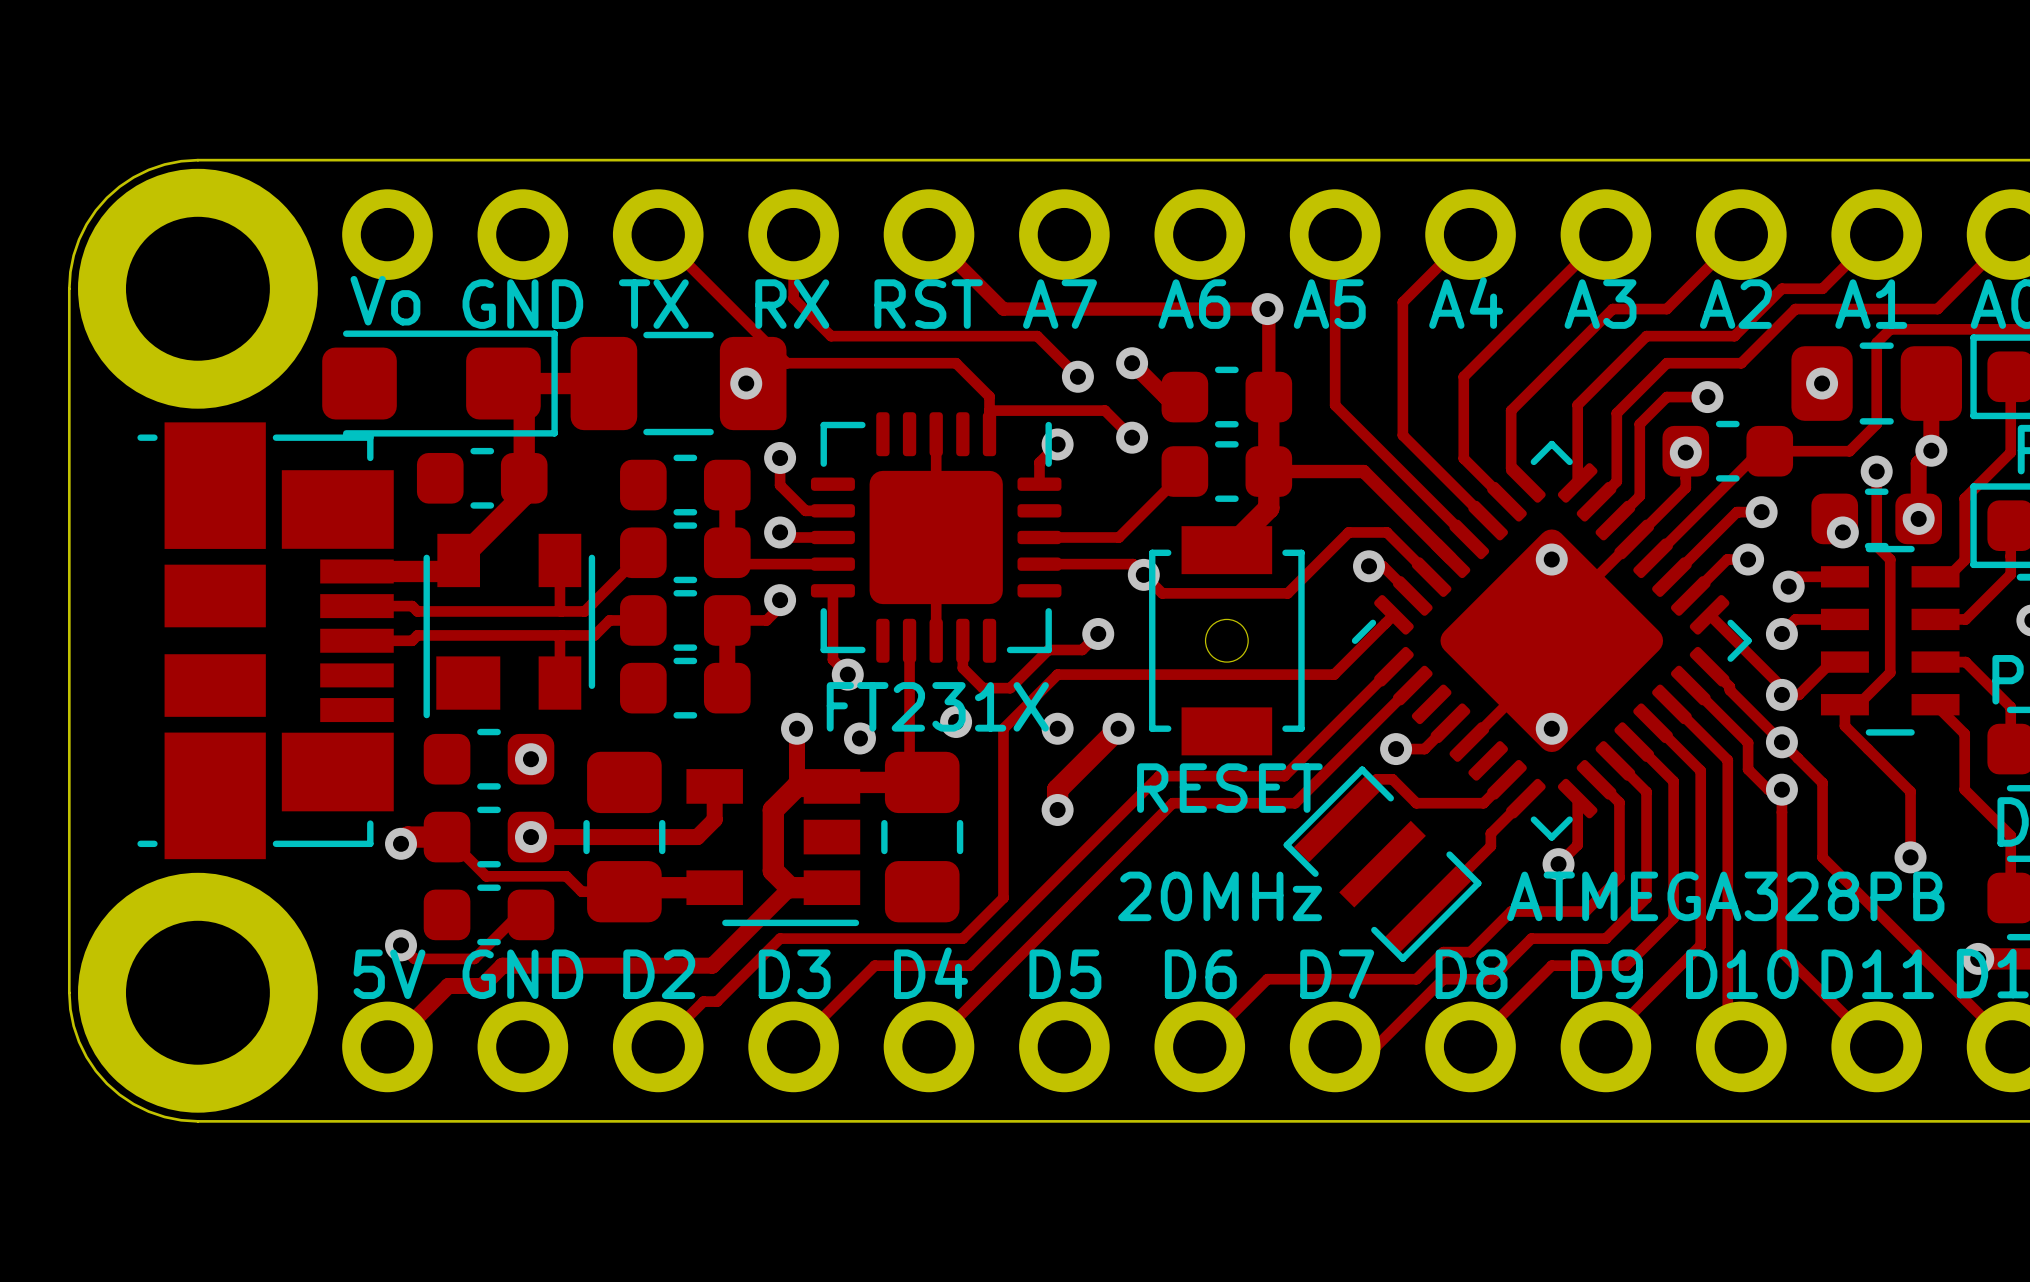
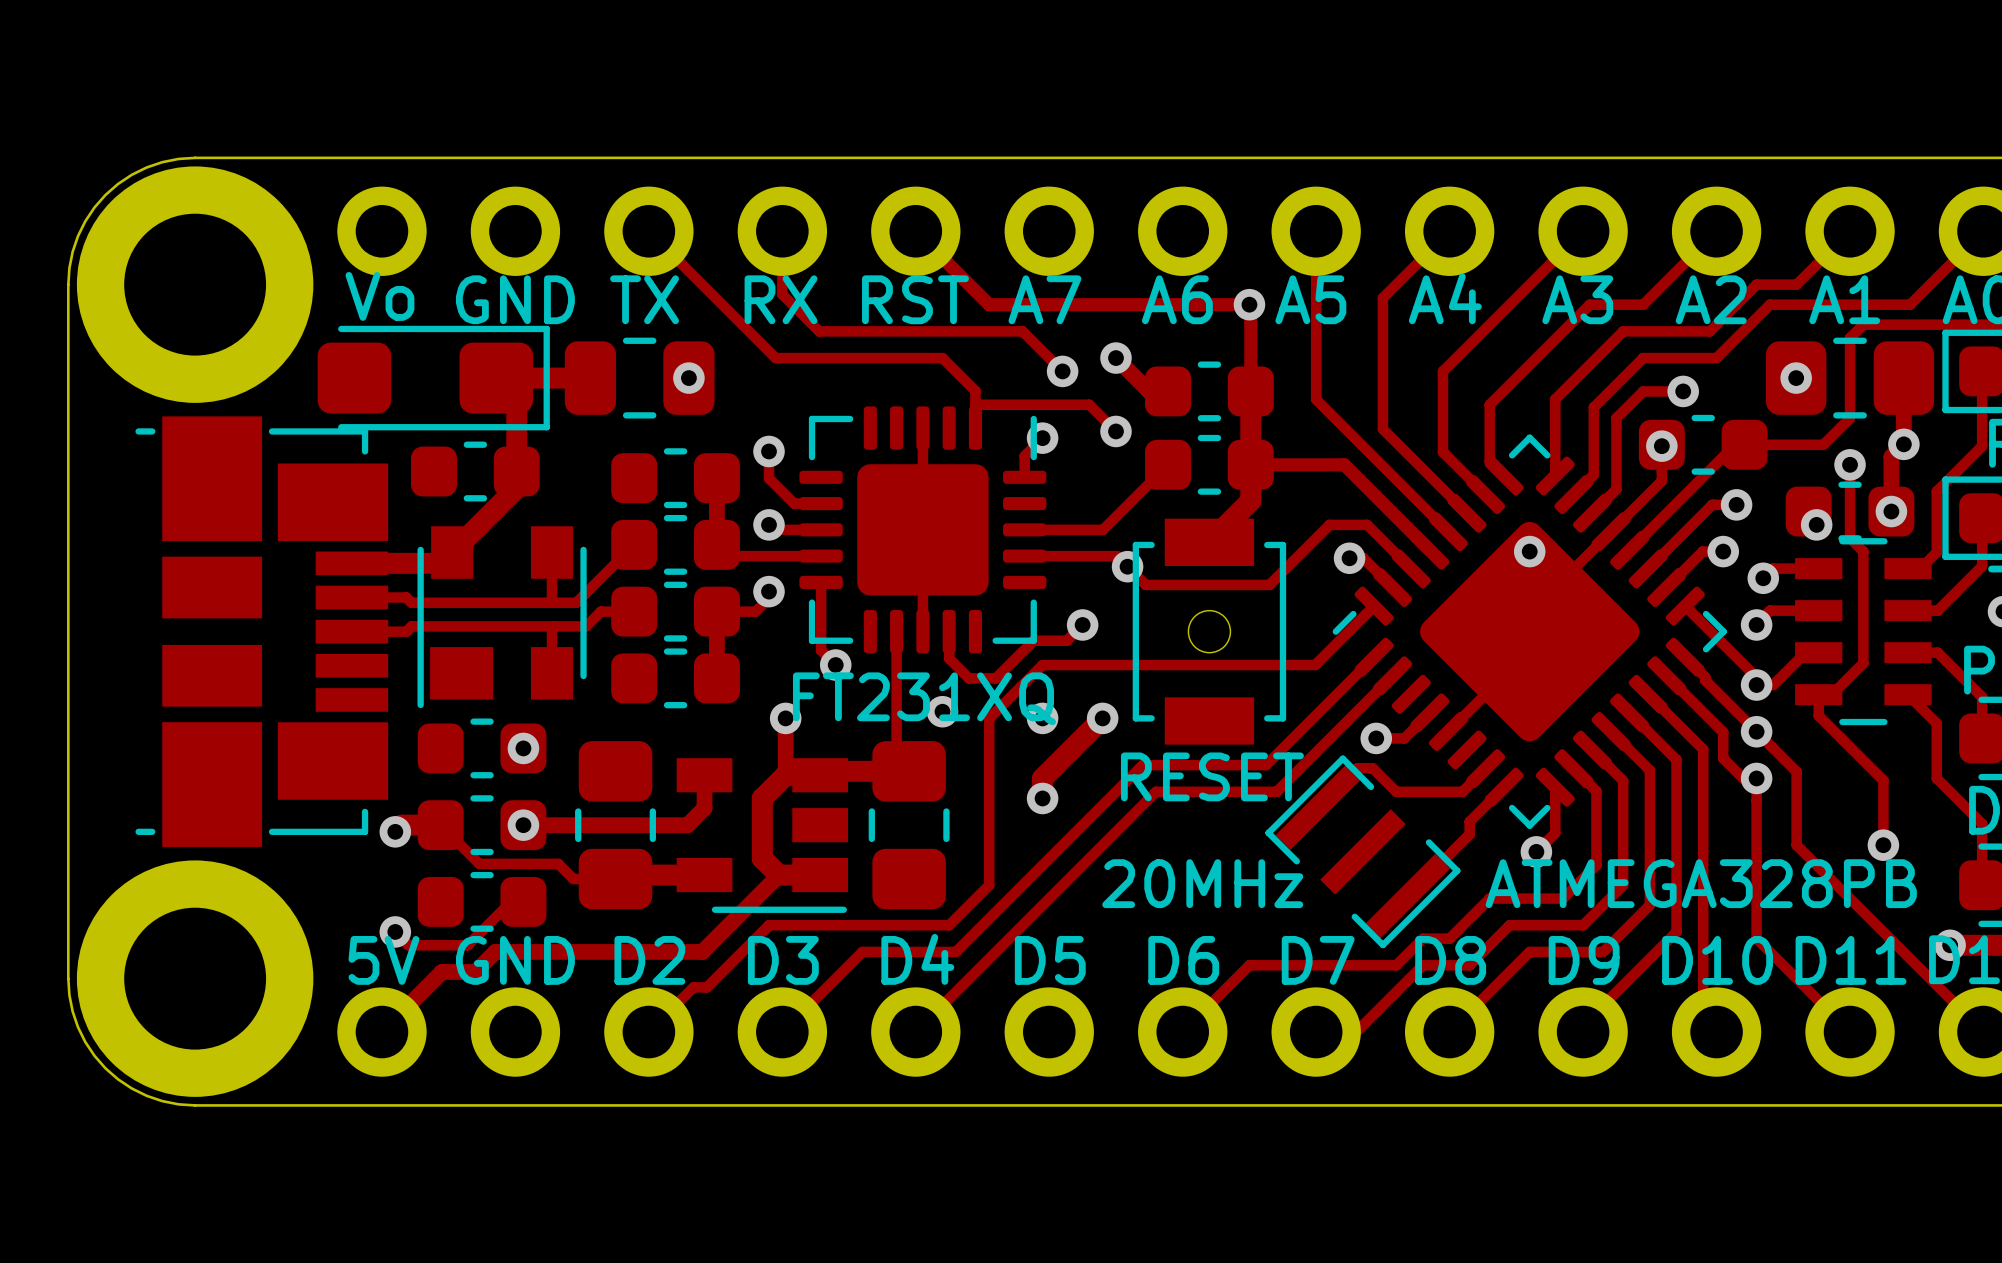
part footprint: [570, 331, 787, 436] -> [564, 337, 715, 419]
via position: (746, 383) -> (688, 378)
FT231X name: FT231X (937, 706) -> FT231XQ (924, 698)
via: (1551, 728) -> none
via: (859, 738) -> none

